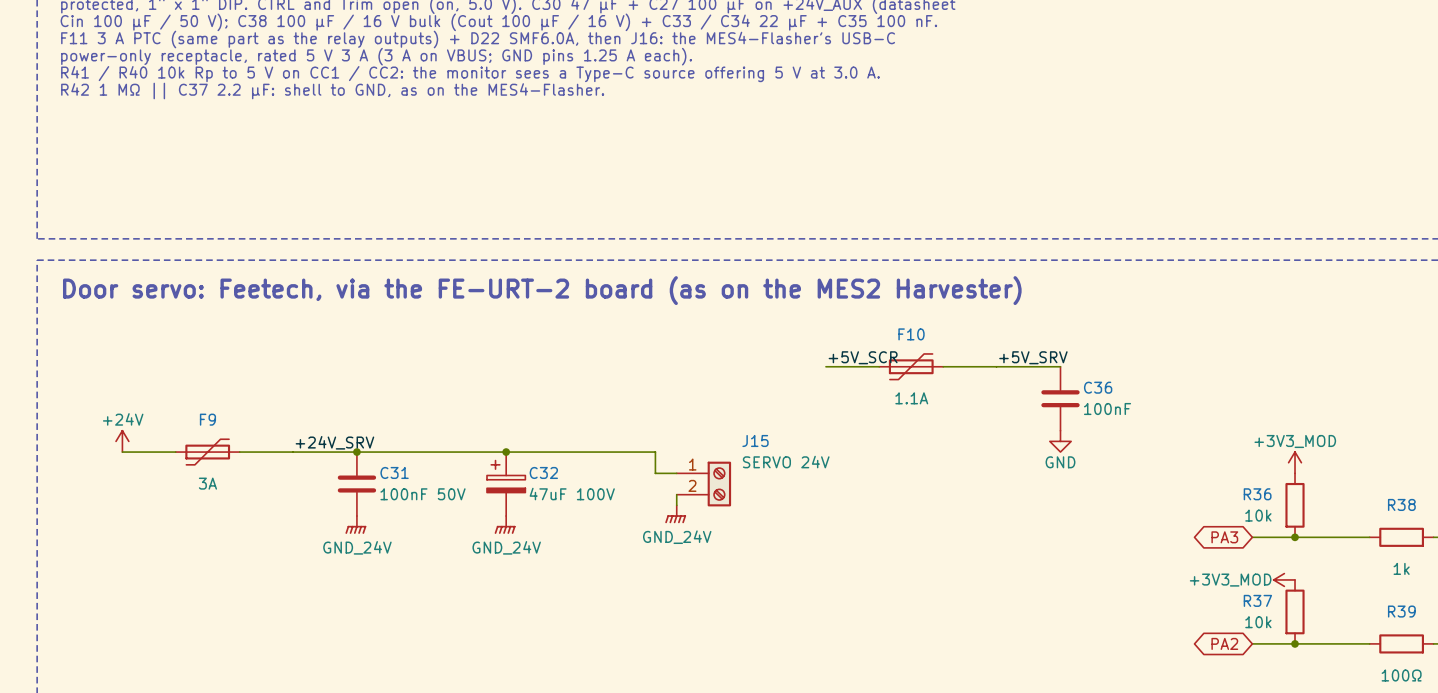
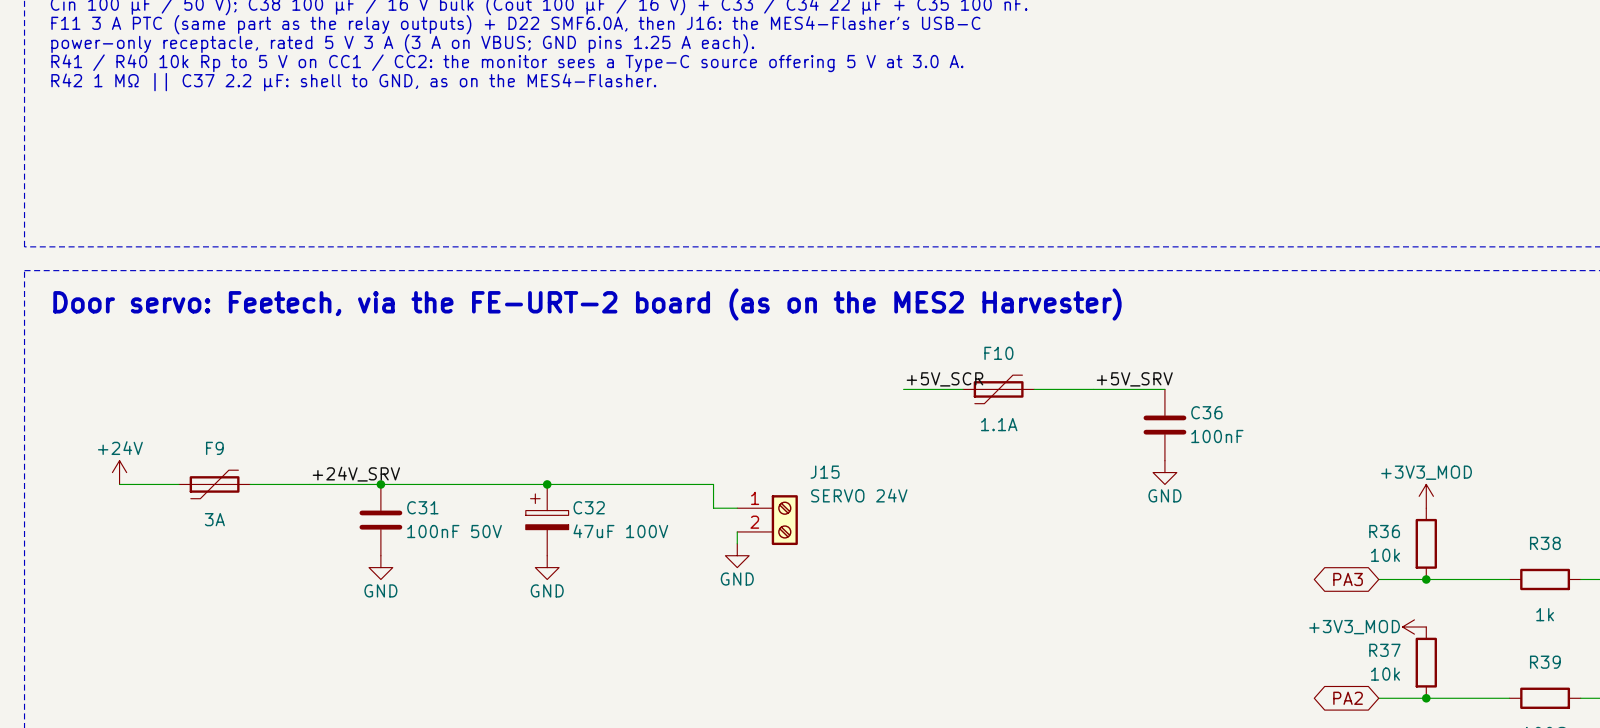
power symbol: GND_24V (675, 514) -> GND (737, 555)
power symbol: GND_24V (355, 524) -> GND (380, 567)
power symbol: GND_24V (505, 524) -> GND (547, 567)

